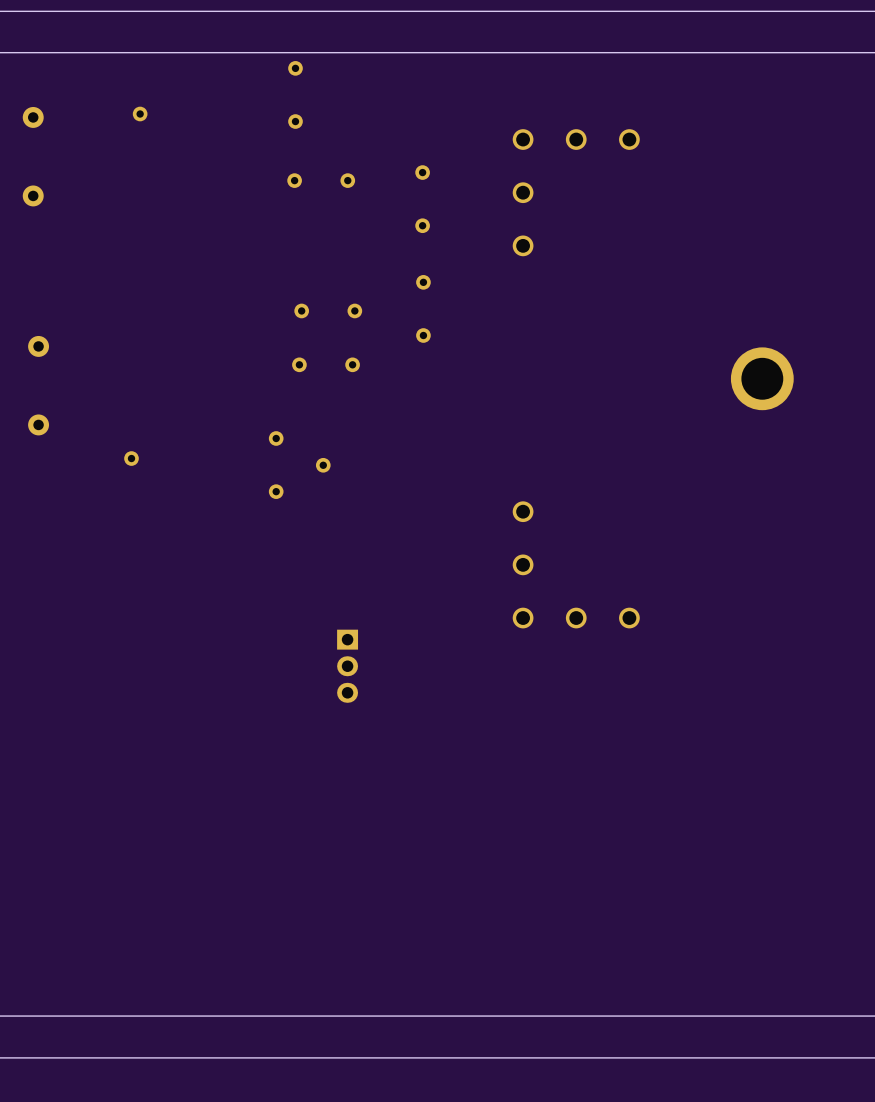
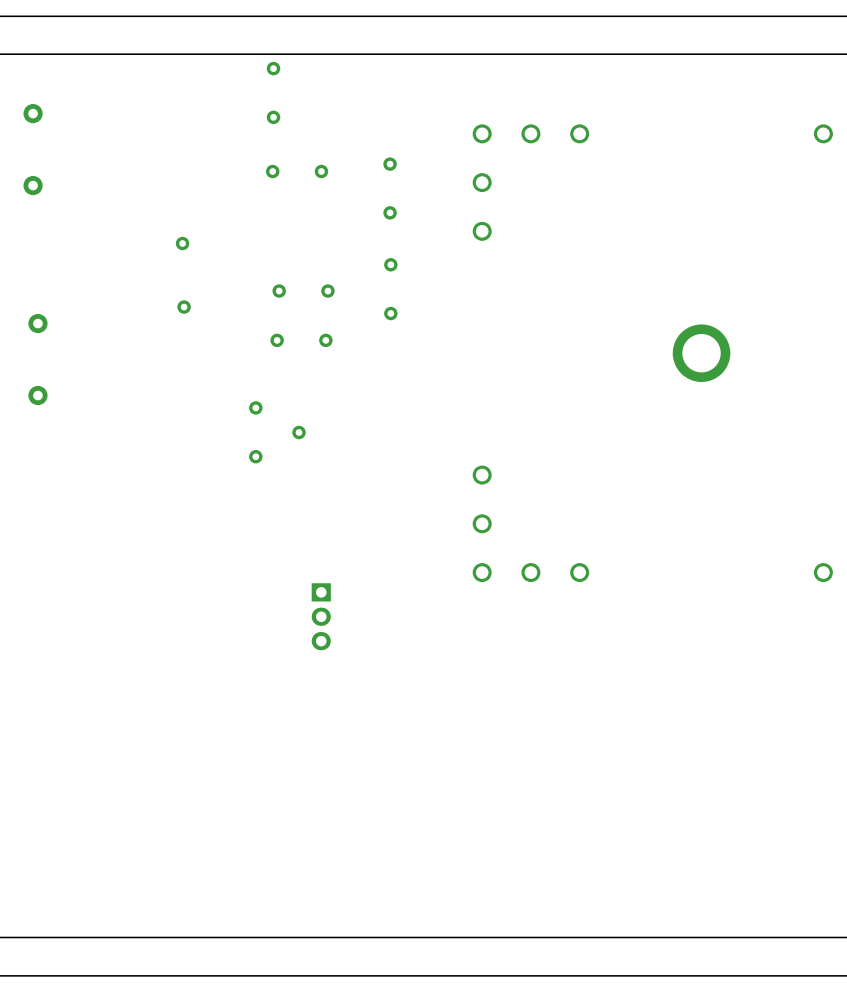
part: (140, 114) -> none
part: none -> (182, 243)
part: none -> (184, 307)
part: (131, 458) -> none

